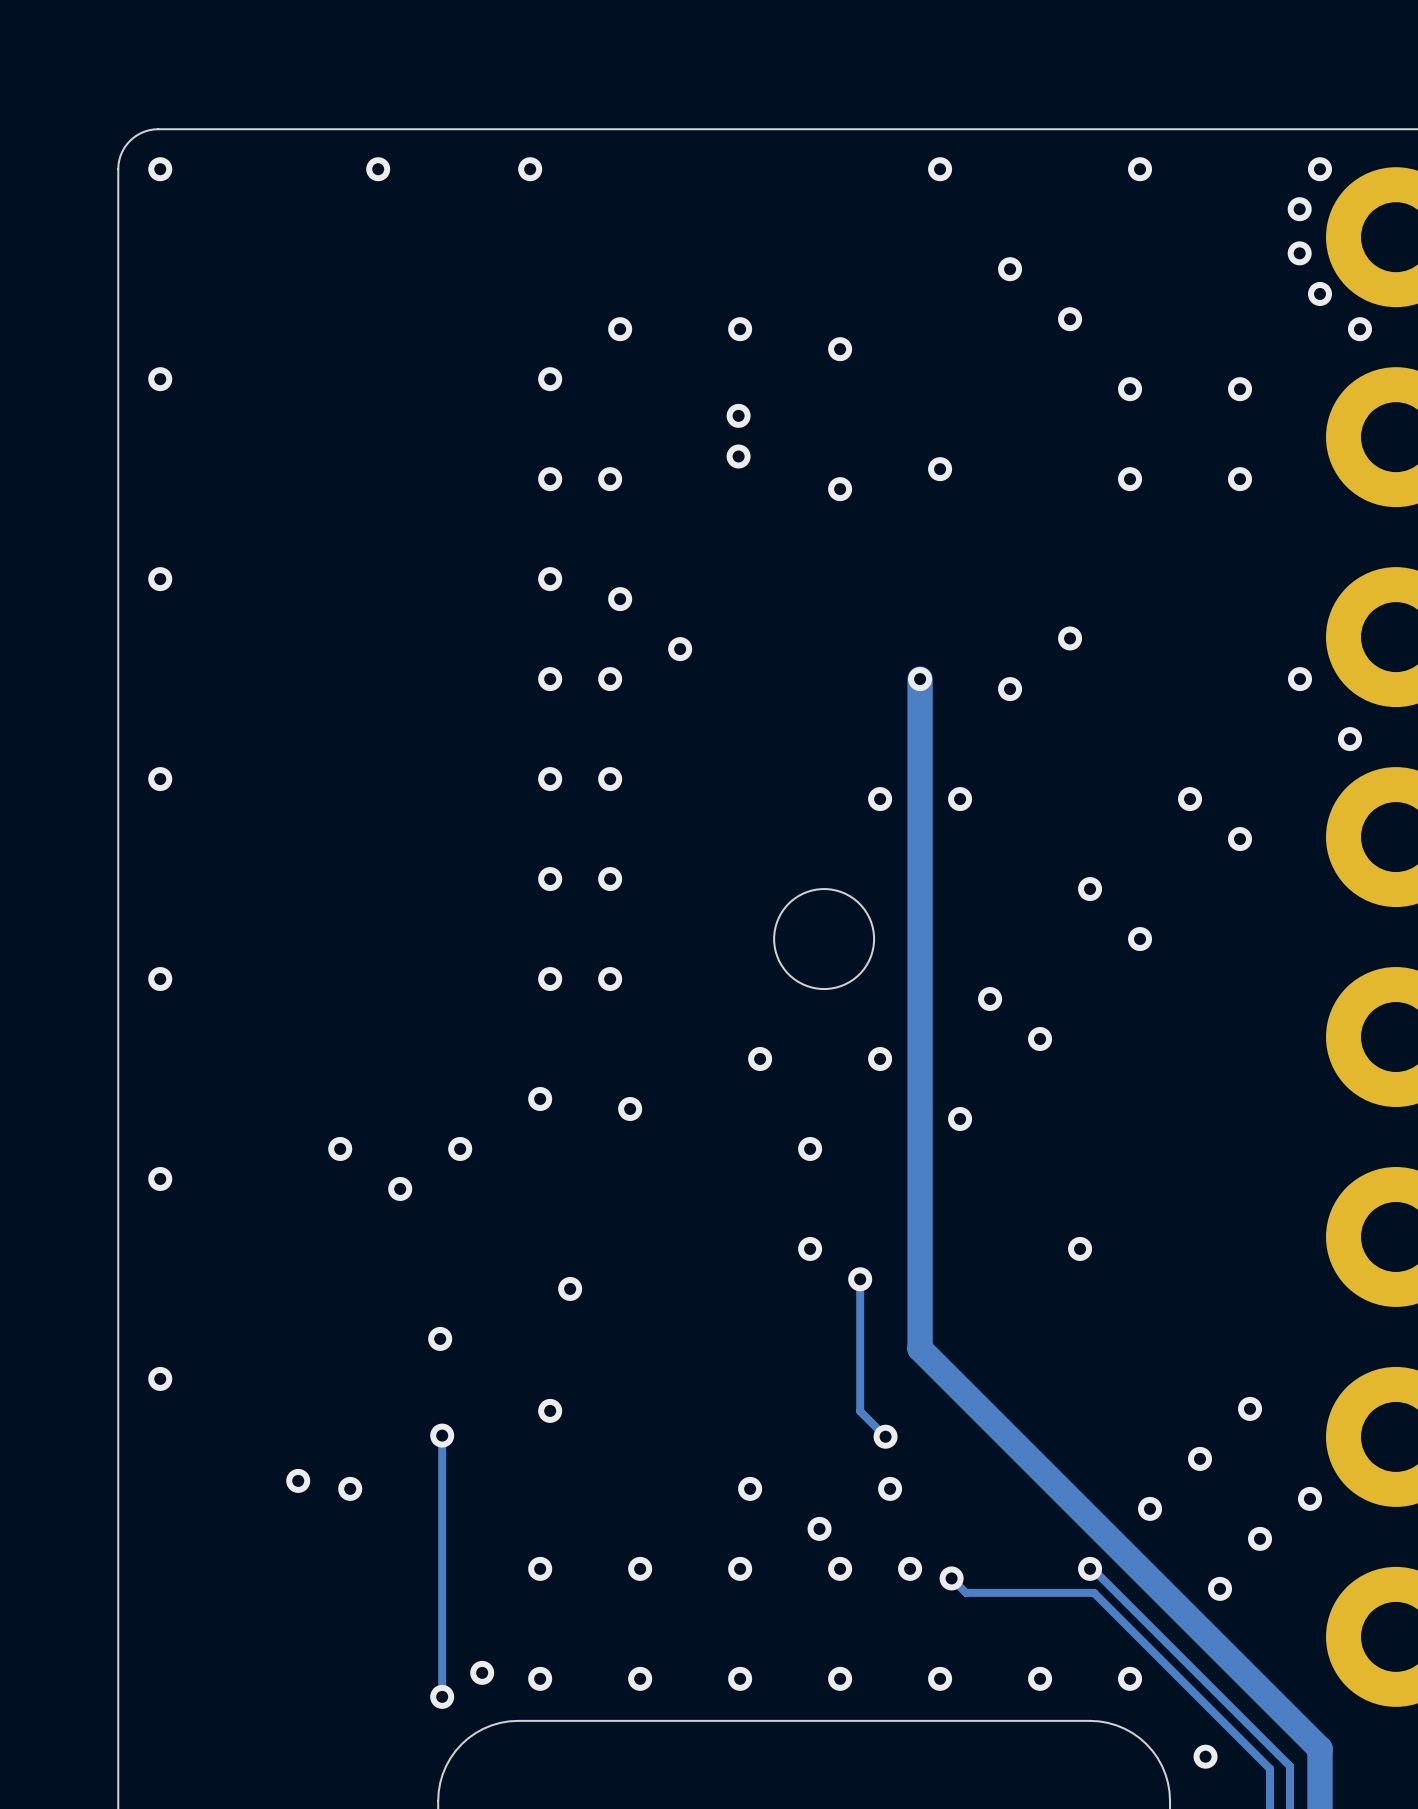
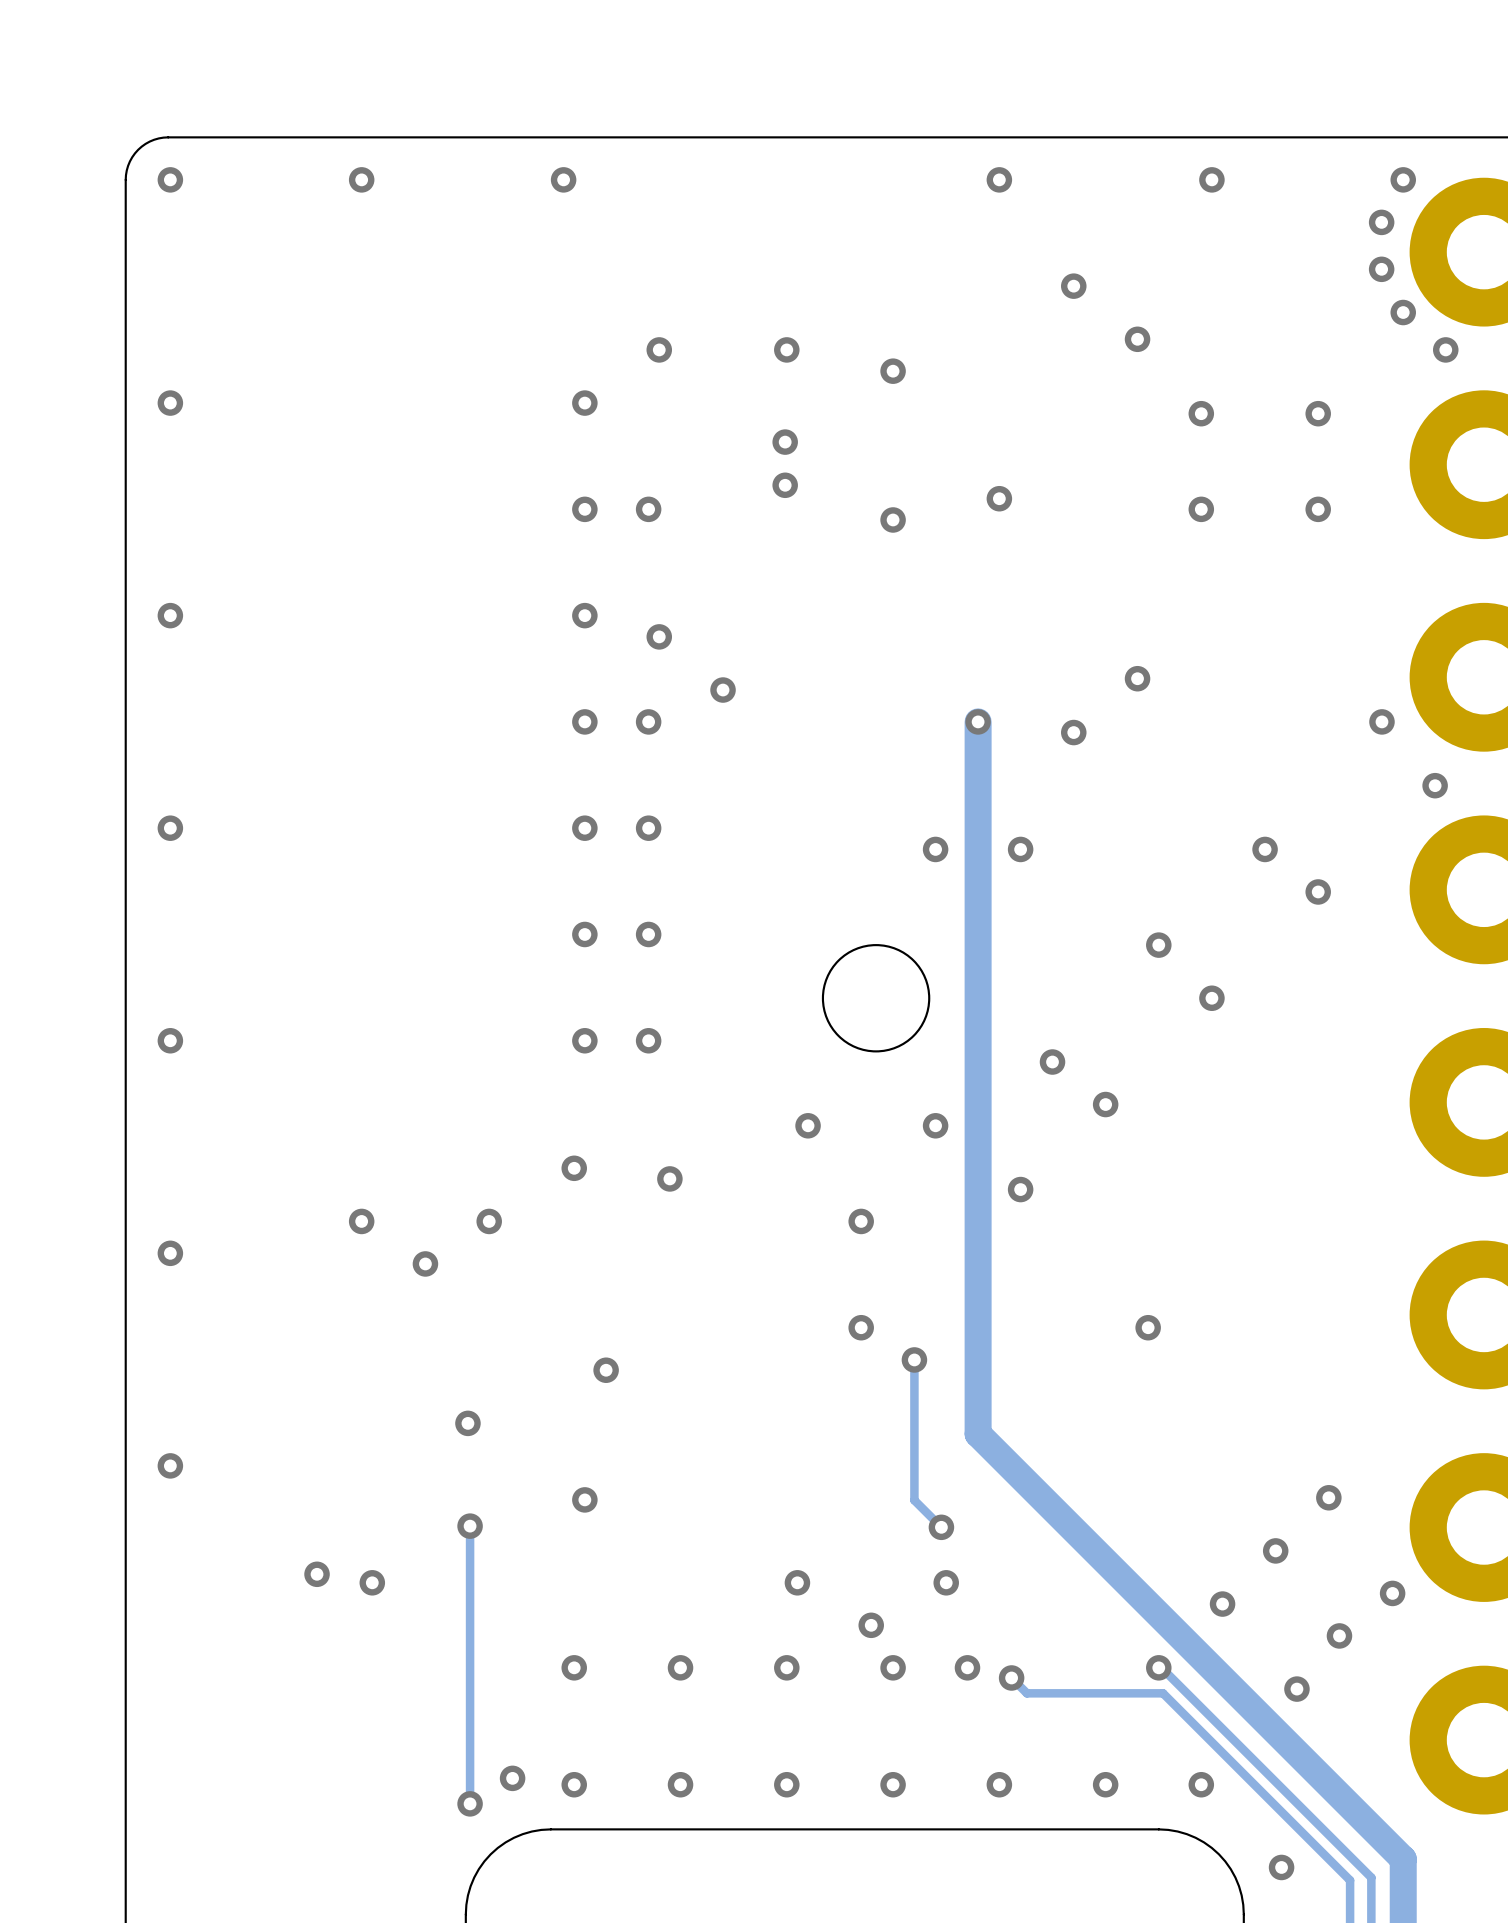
via position: (378, 169) -> (361, 179)

